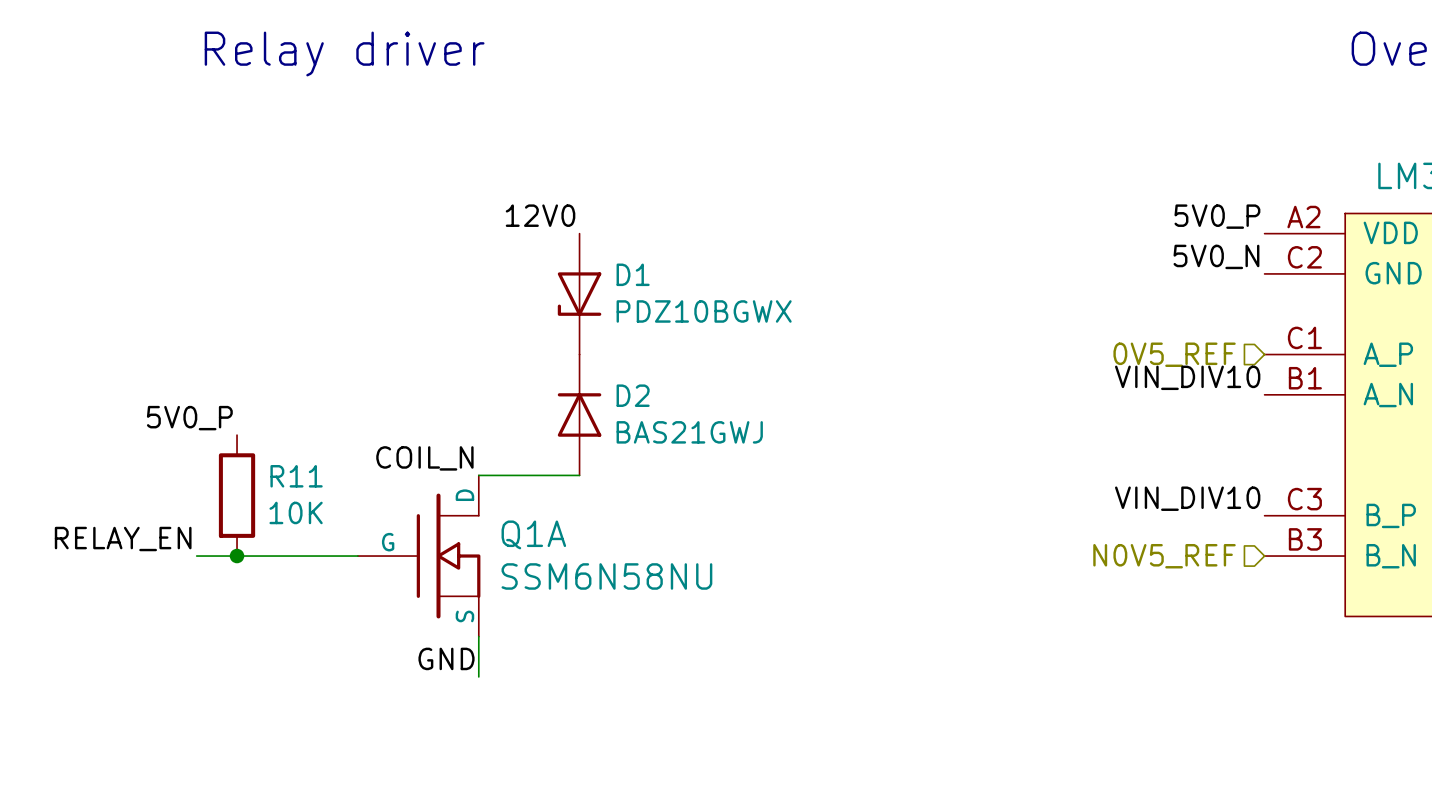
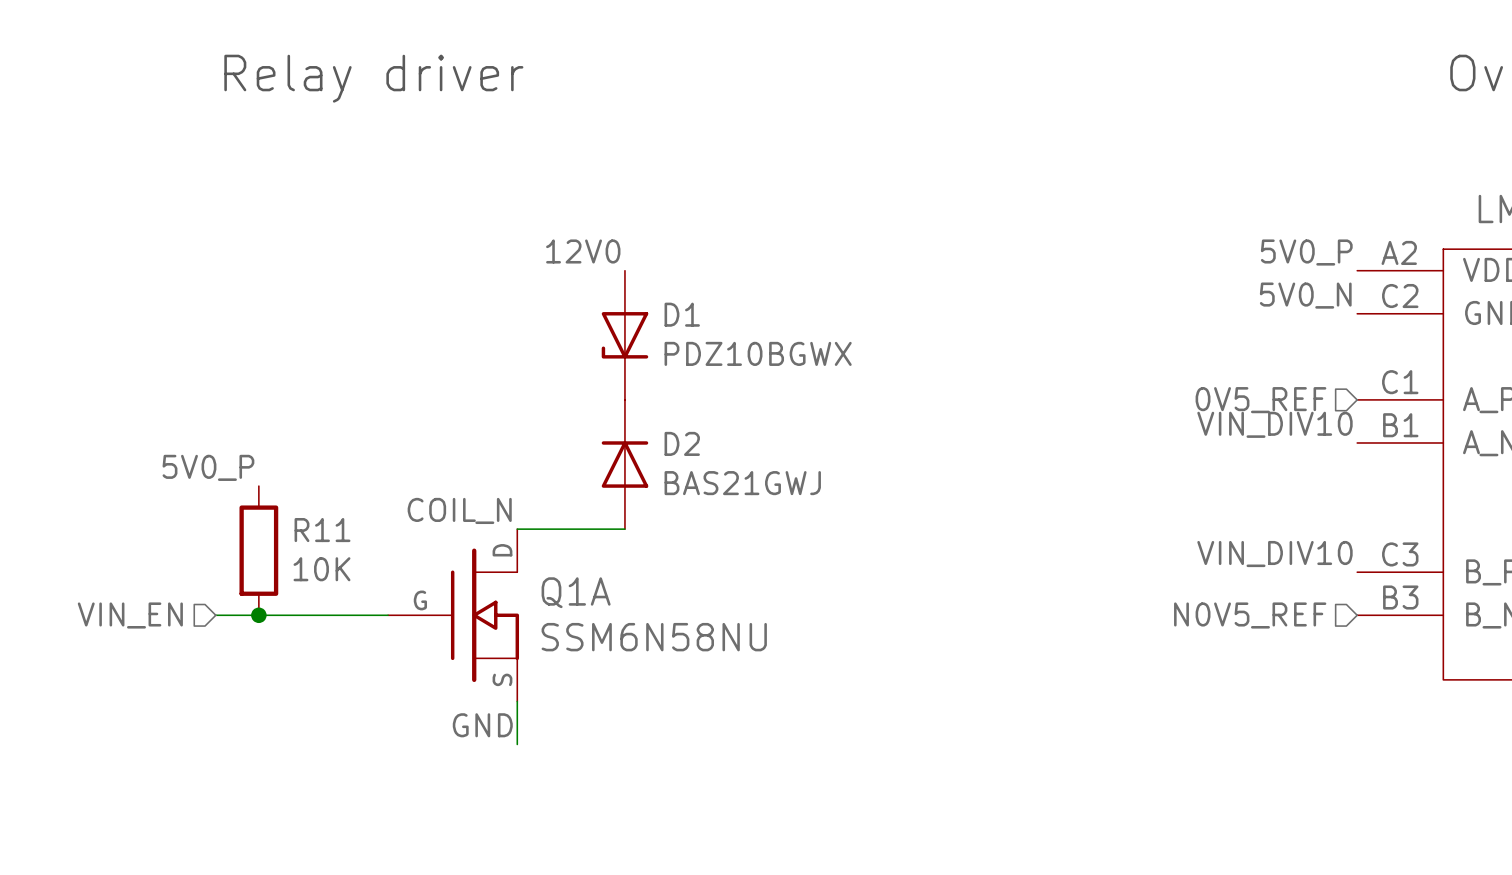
label: RELAY_EN (123, 539) -> none
hierarchical label: none -> VIN_EN (130, 615)

